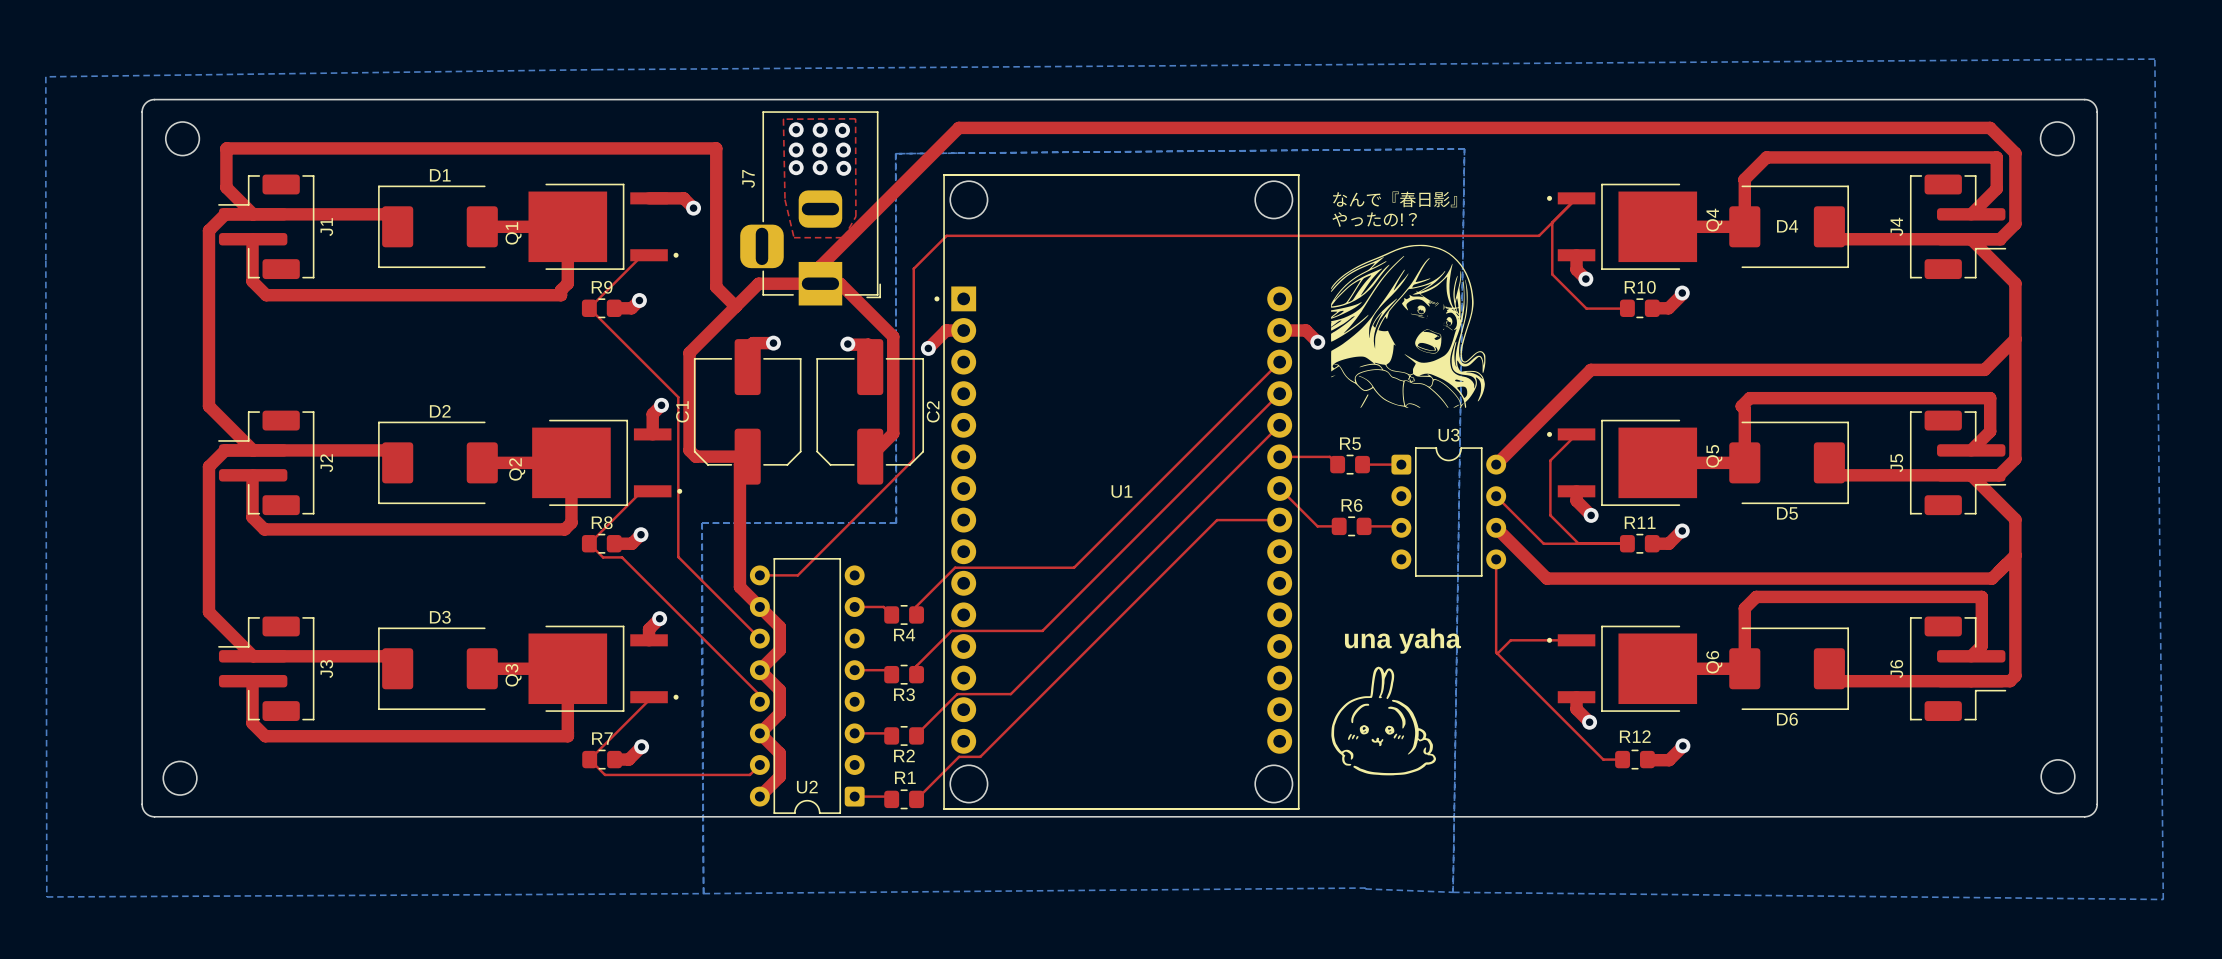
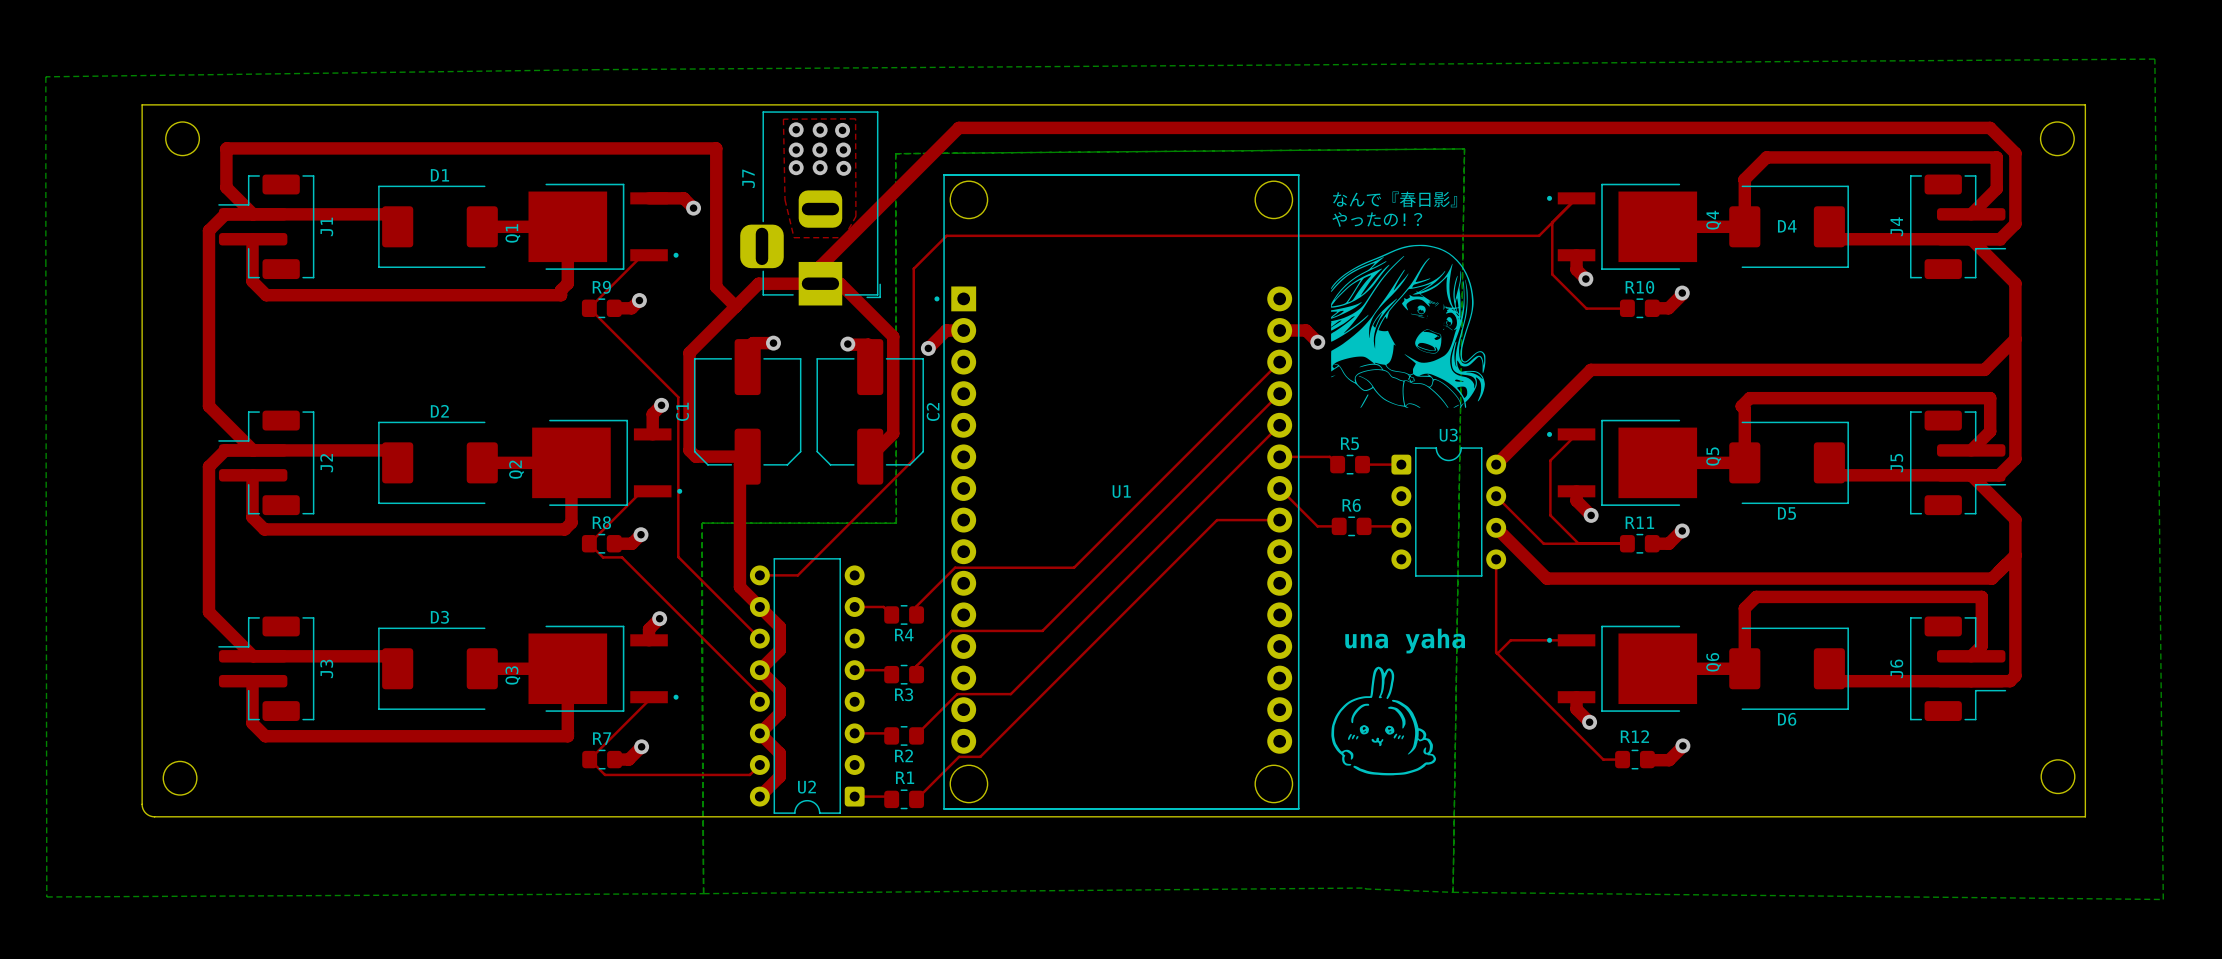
board edge: (142, 112) (145, 103) (154, 99) (2088, 100) (2094, 104) (2097, 112) (2097, 804) (2093, 813) (2084, 816) -> (142, 112) (142, 104) (2085, 104) (2084, 816)

